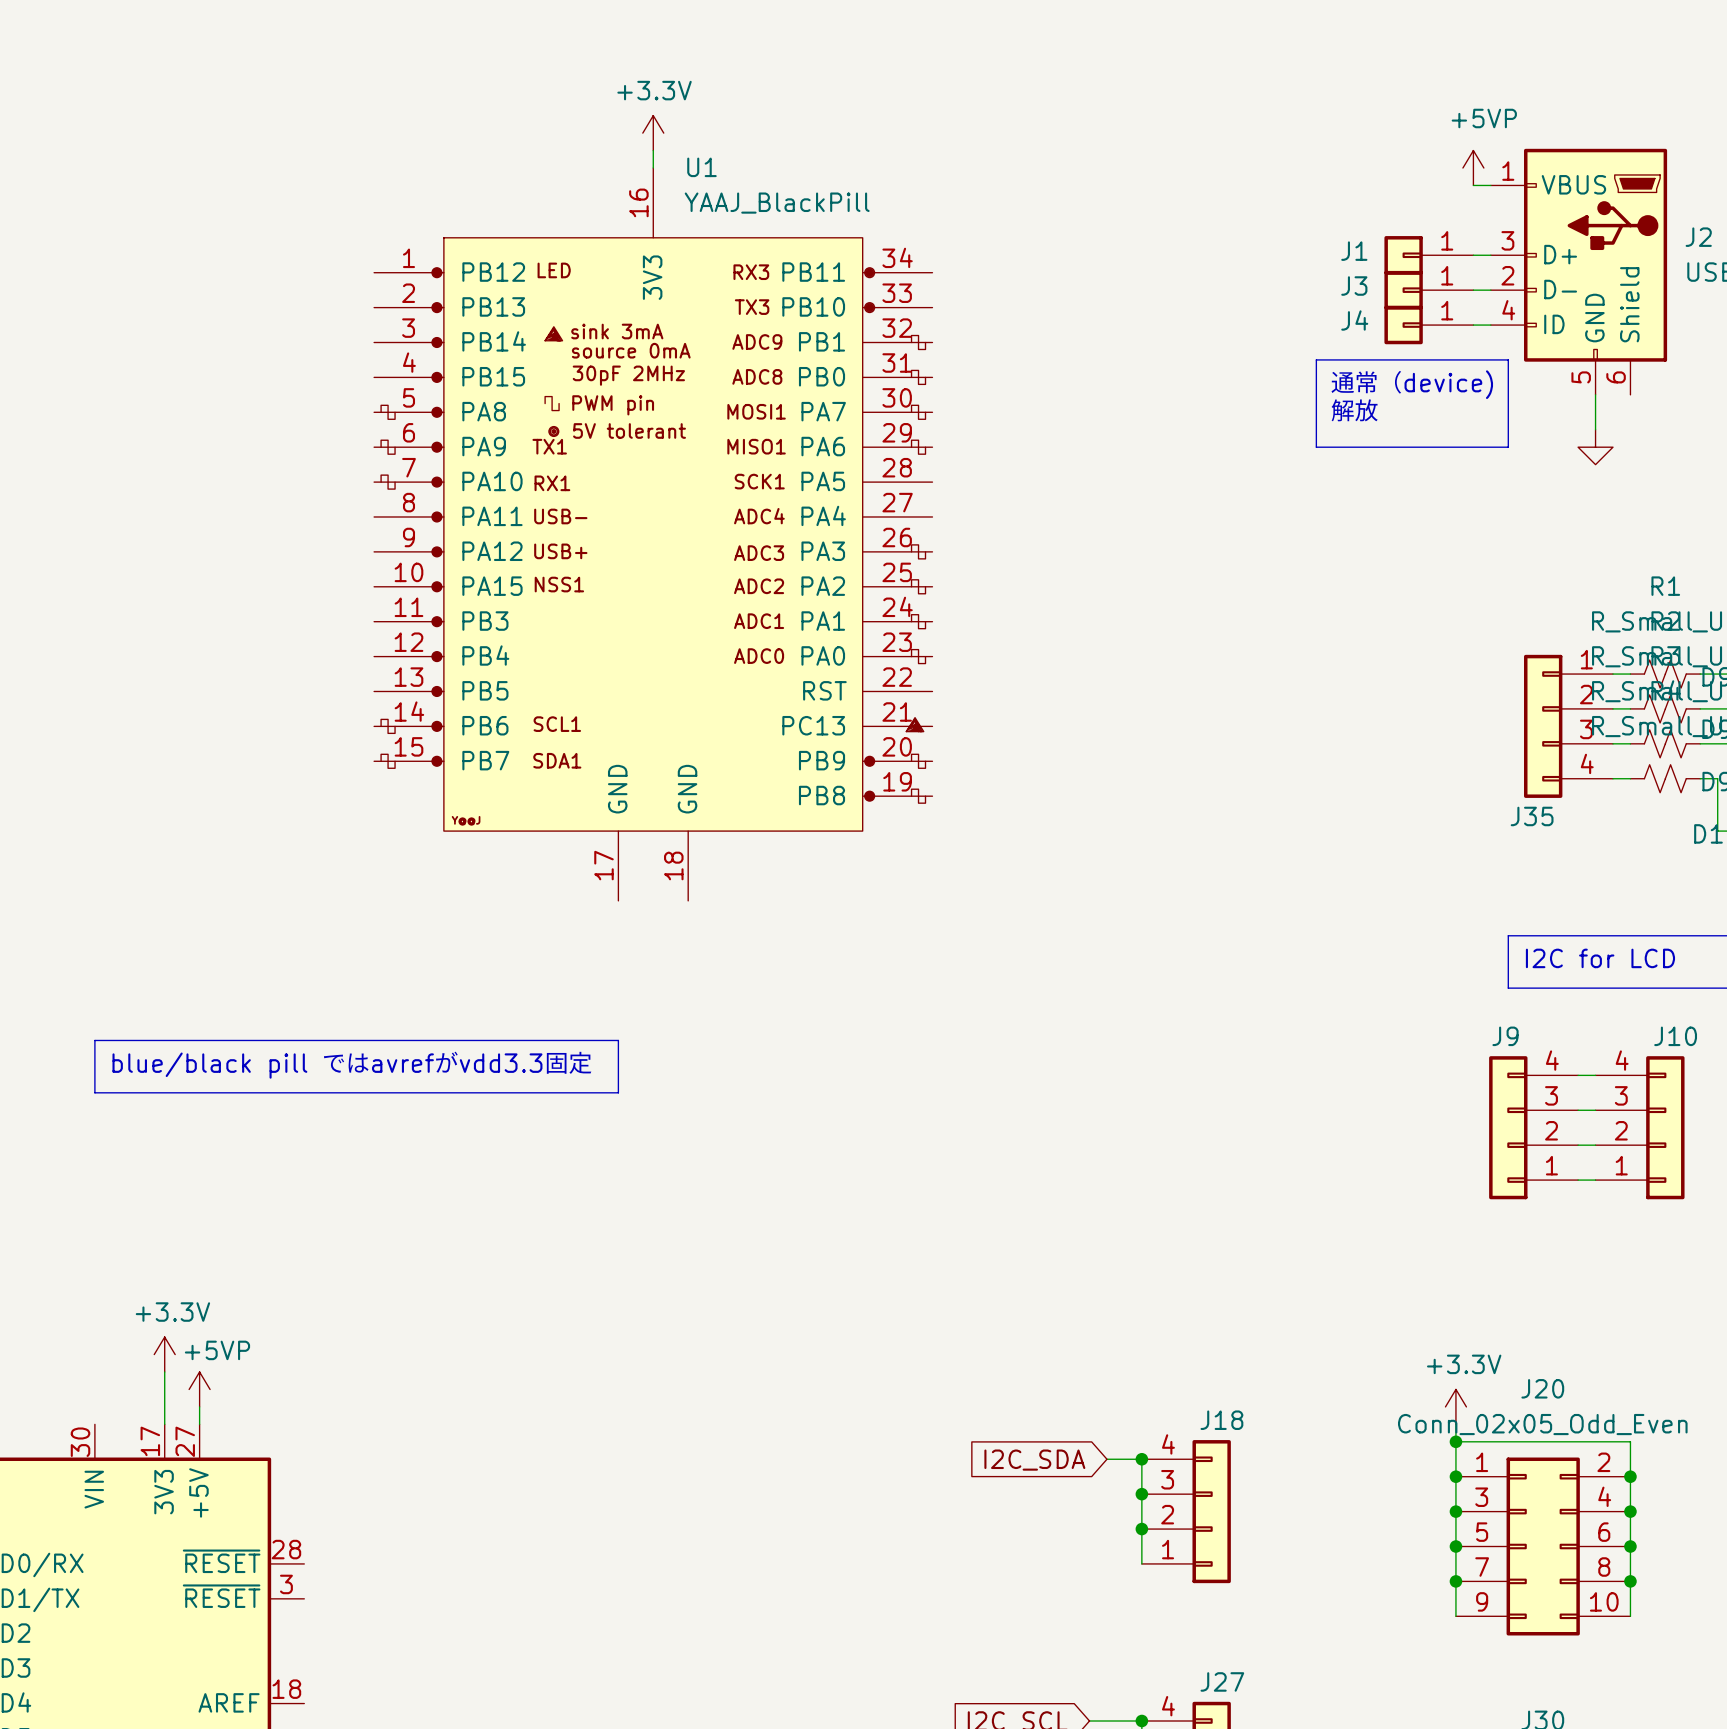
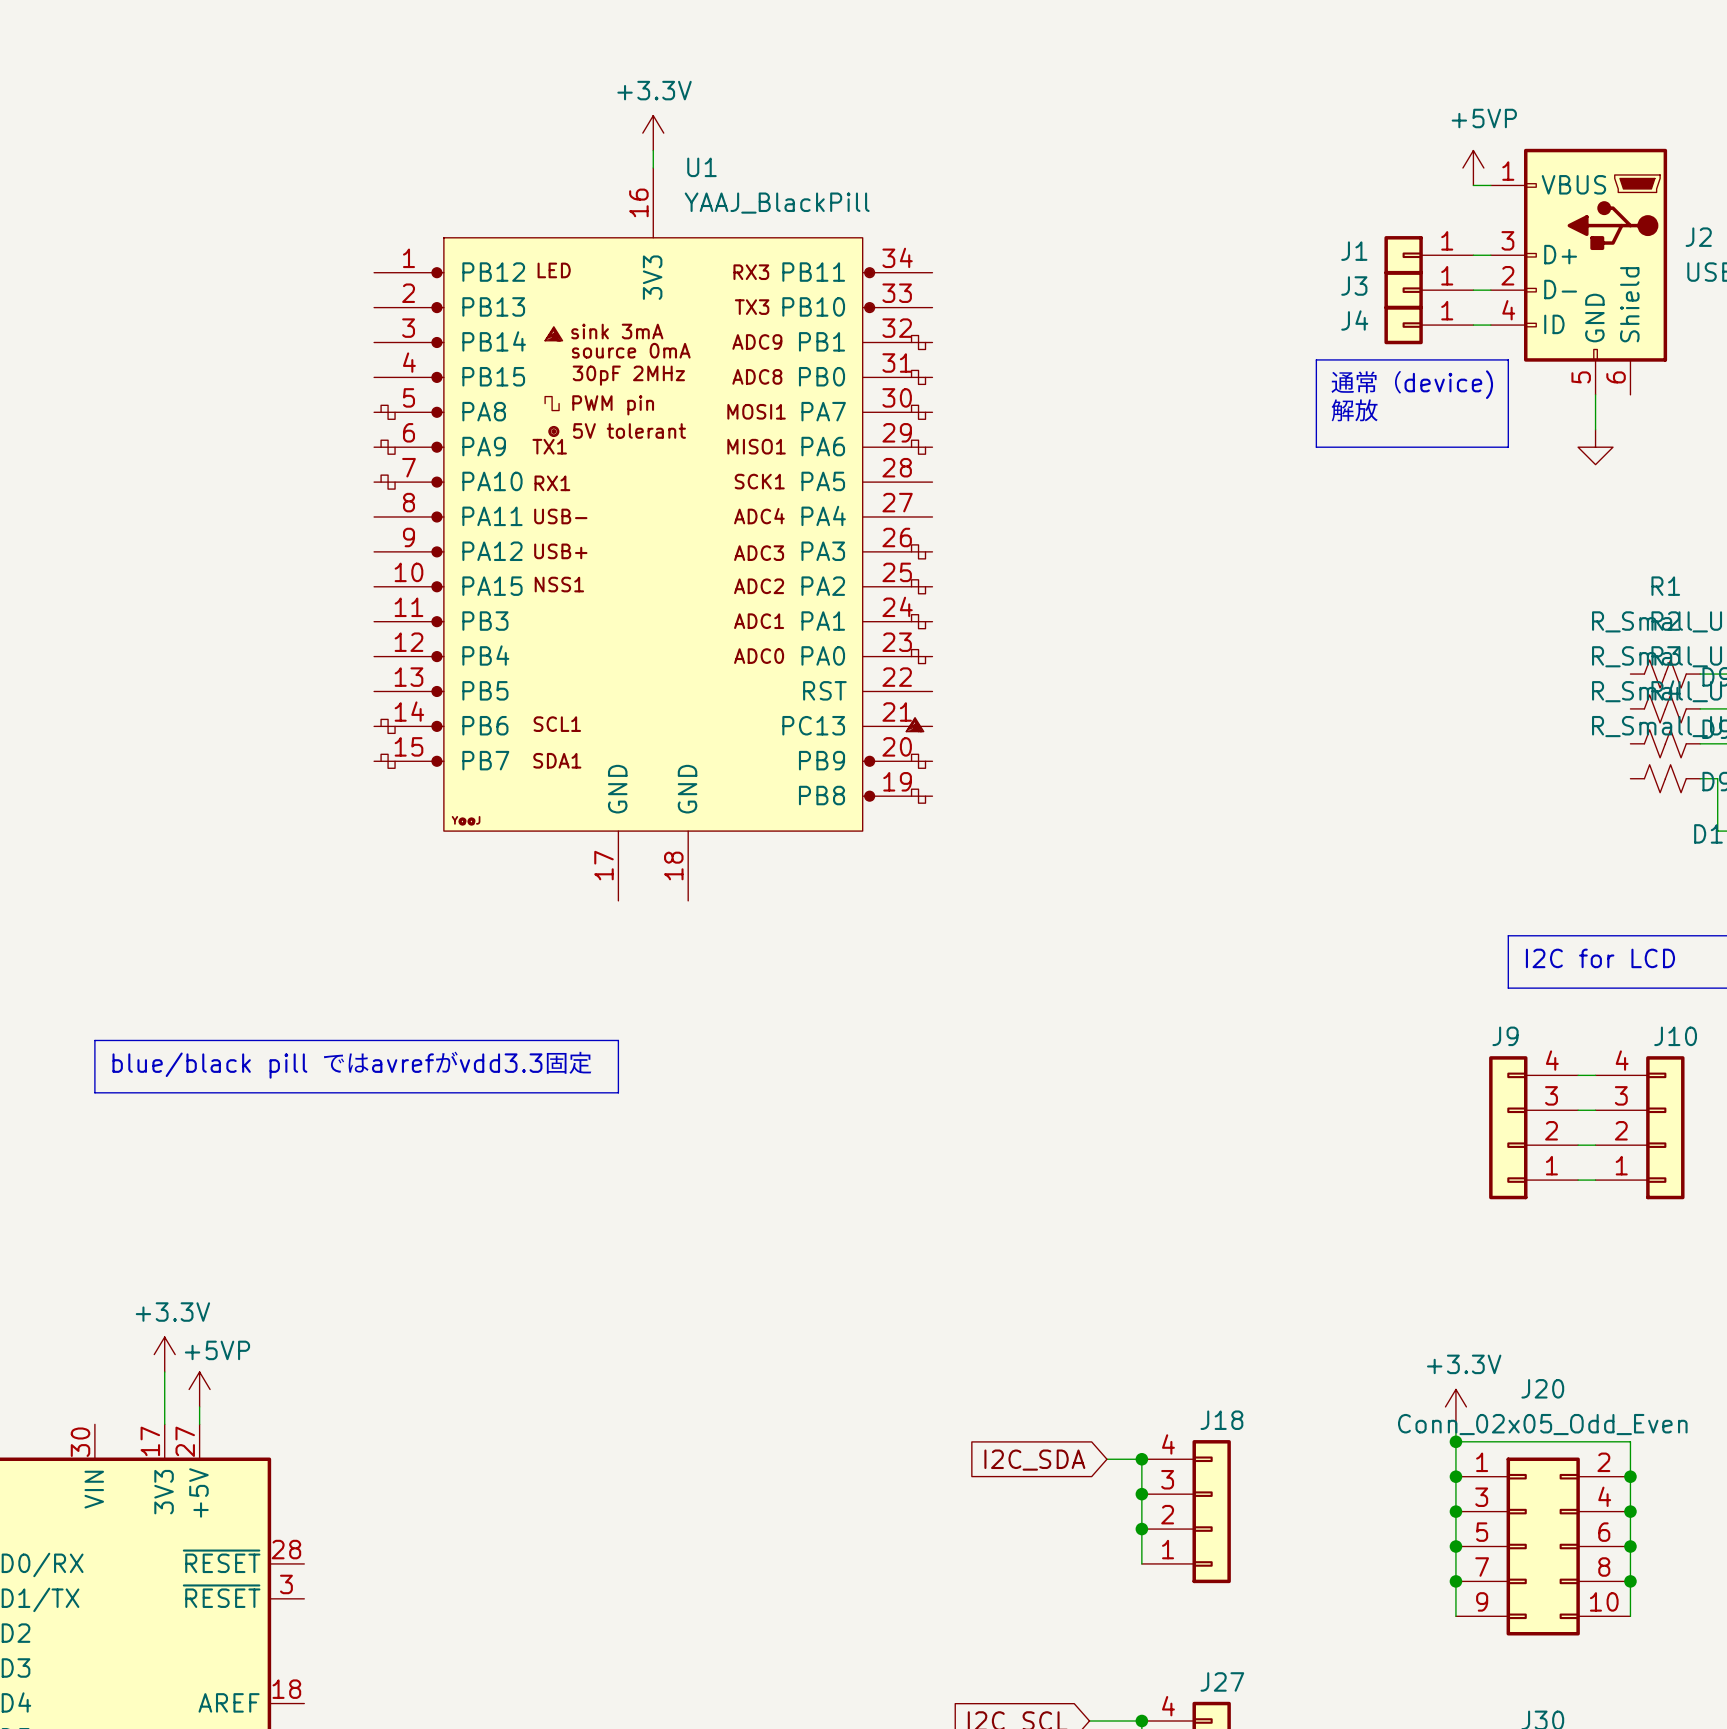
wire: (1613, 674) (1630, 674) -> none
wire: (1613, 708) (1630, 708) -> none
J35: (1568, 726) -> none
wire: (1613, 743) (1630, 743) -> none
wire: (1613, 778) (1630, 778) -> none

